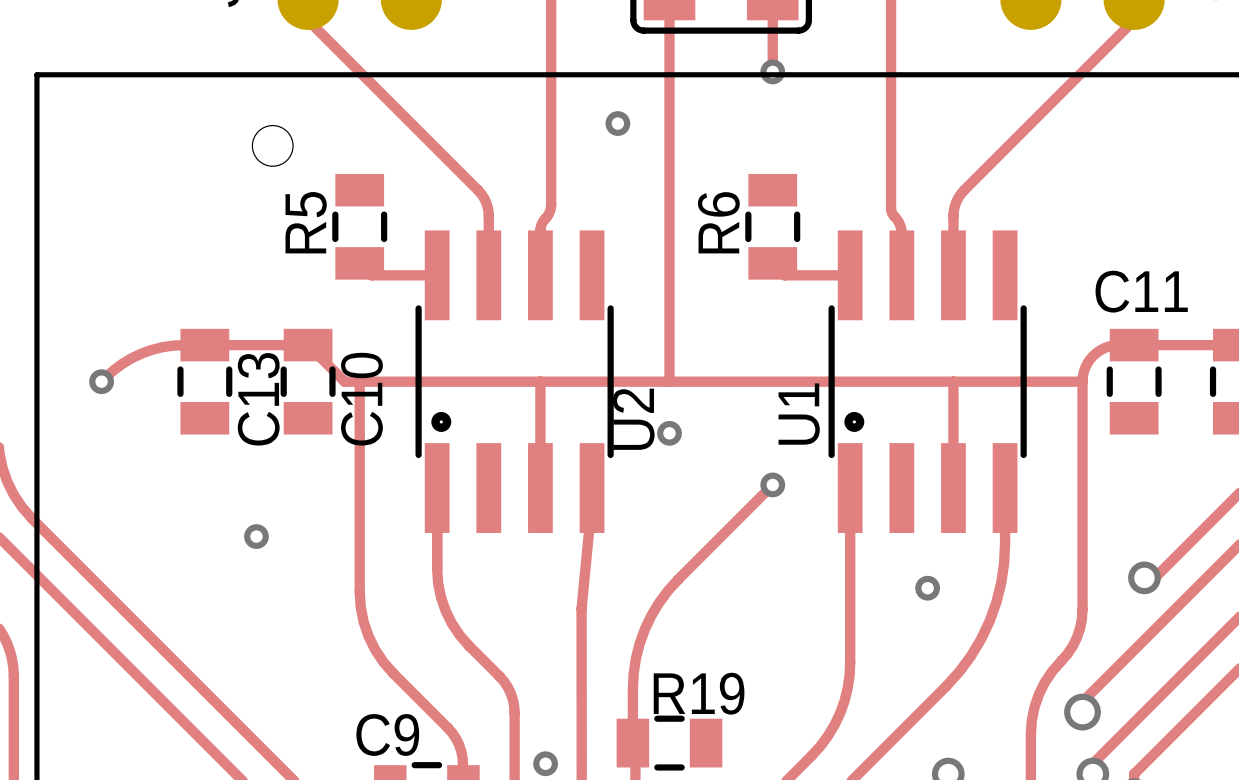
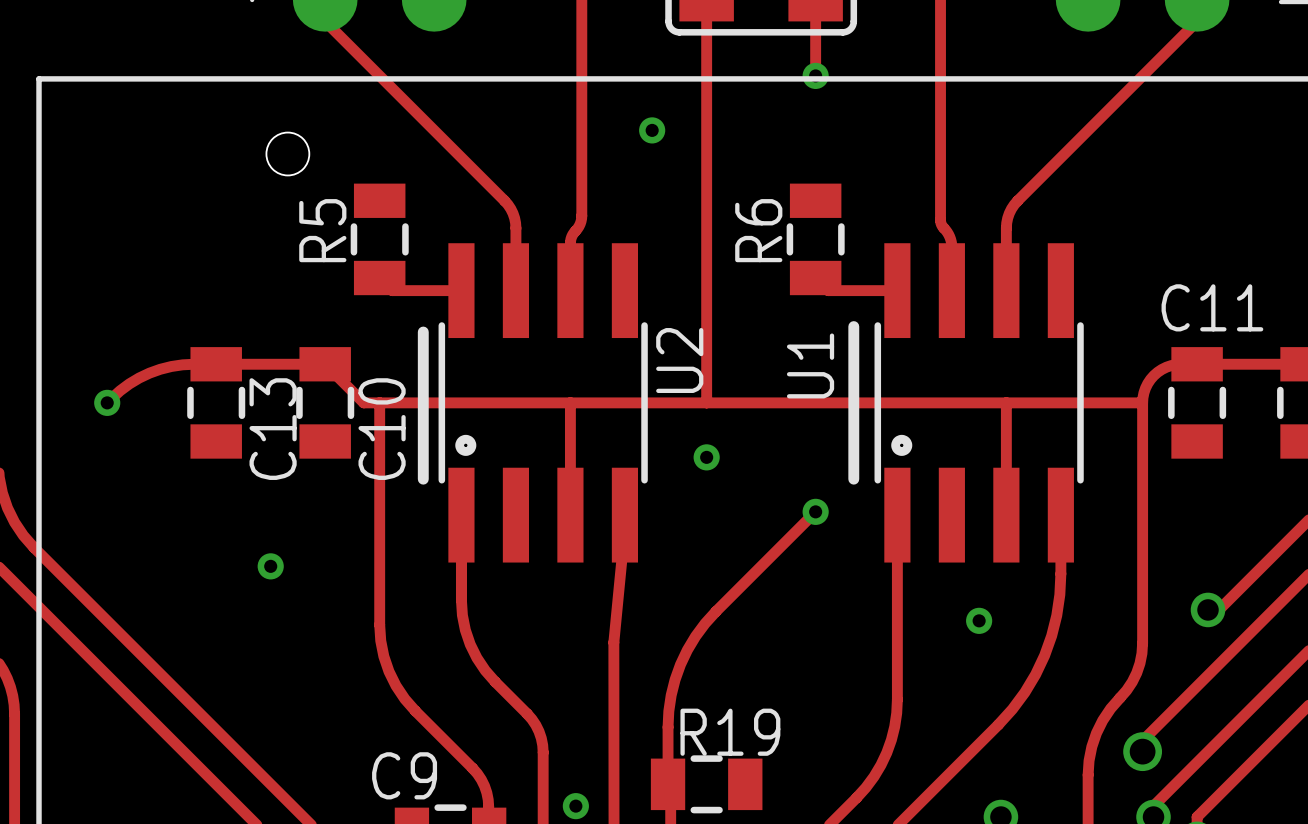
line: none -> (853, 326) (853, 479)
line: none -> (423, 332) (423, 479)
U1 name position: U1 (799, 414) -> U1 (810, 365)
U2 name position: U2 (633, 419) -> U2 (679, 360)

